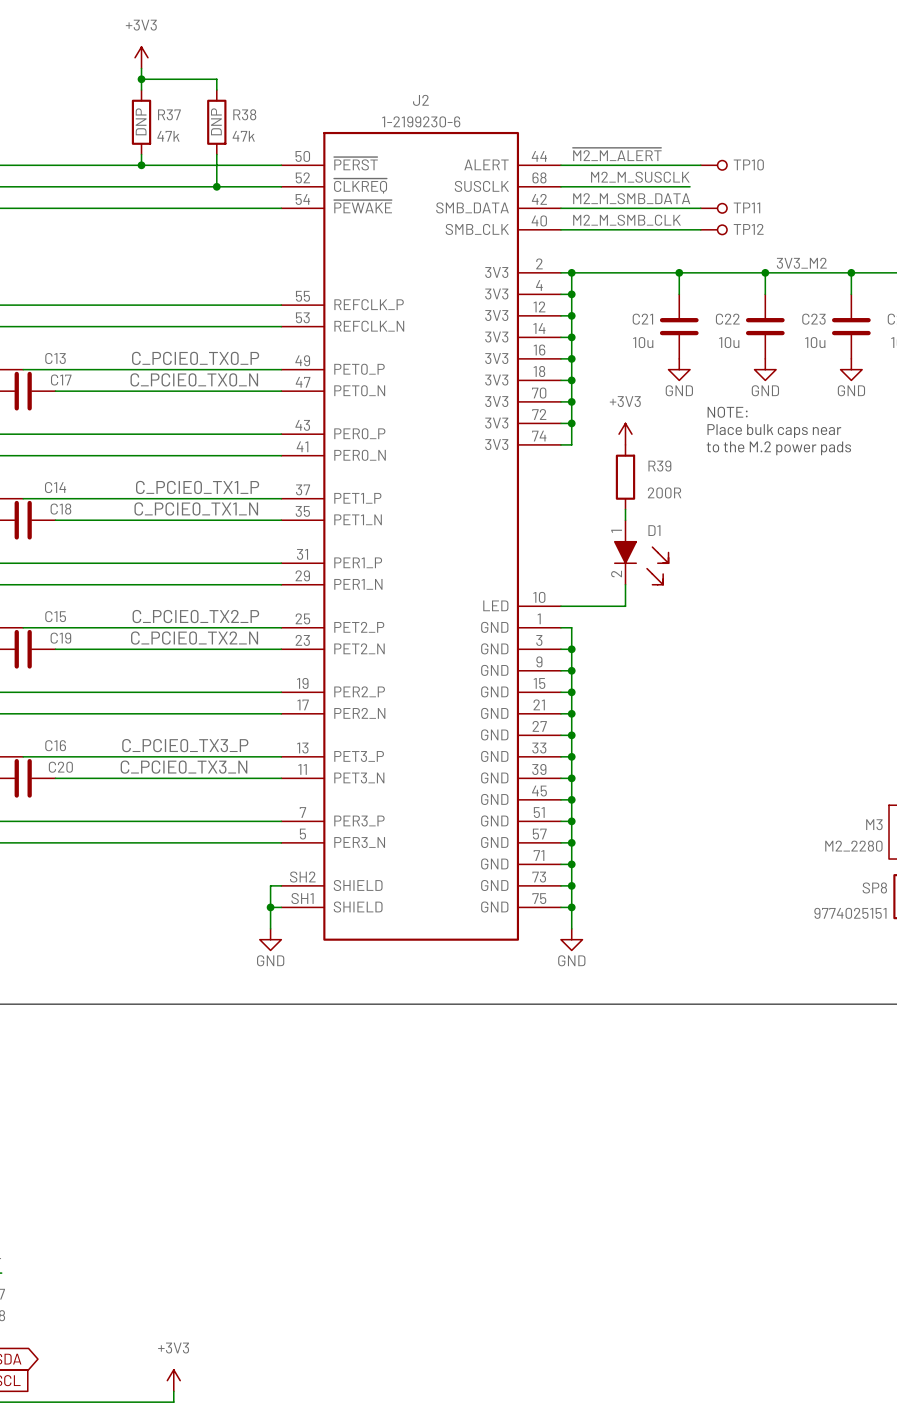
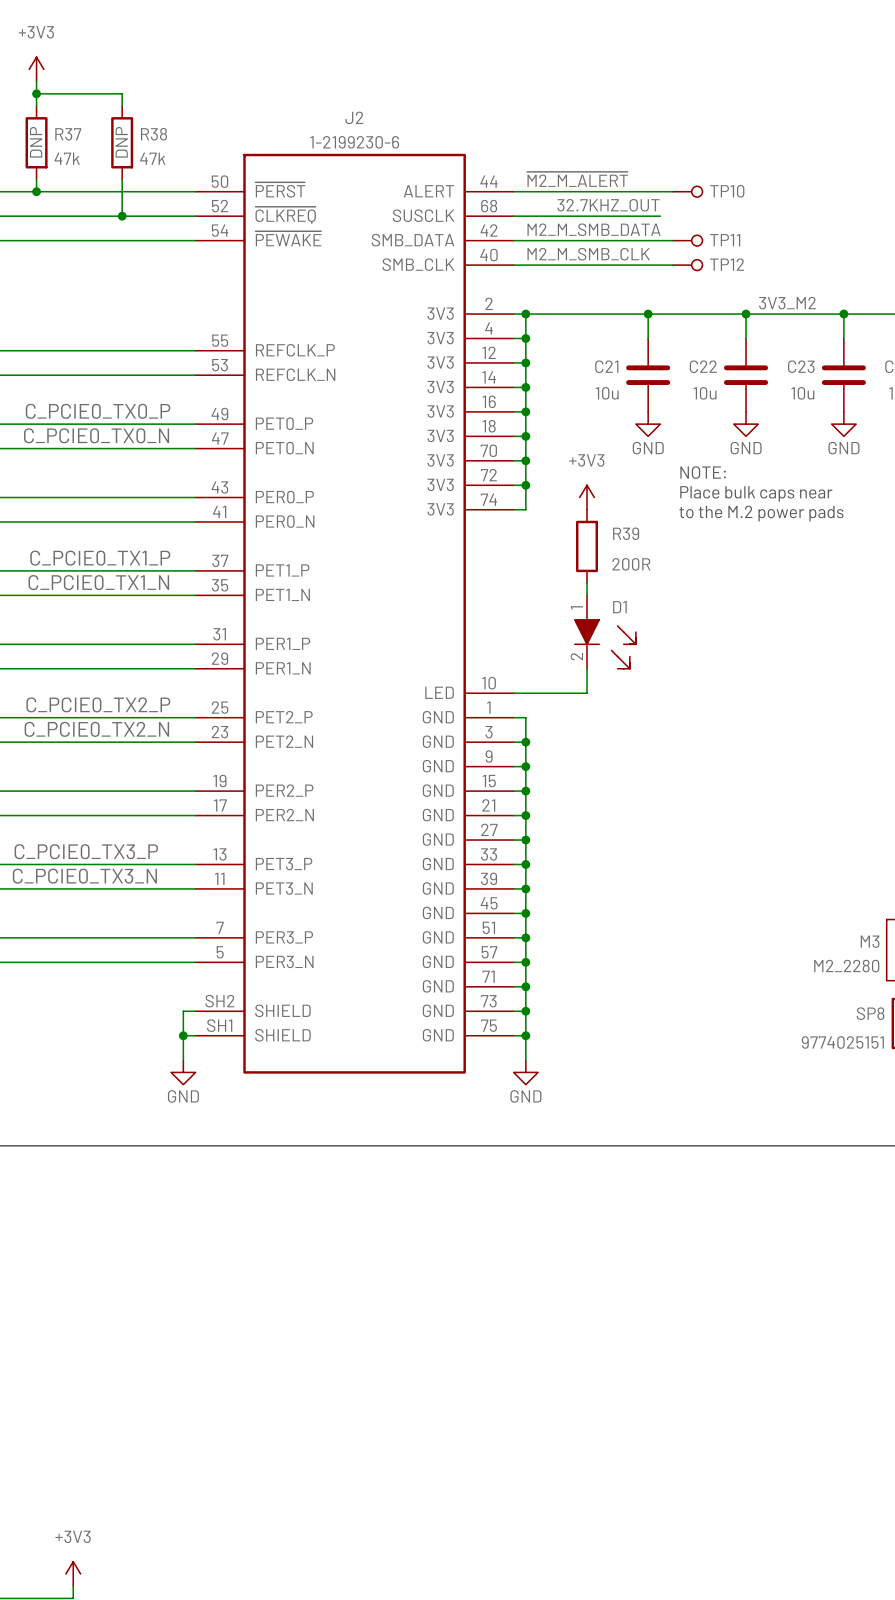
label: M2_M_SUSCLK (640, 177) -> 32.7KHZ_OUT (608, 205)

